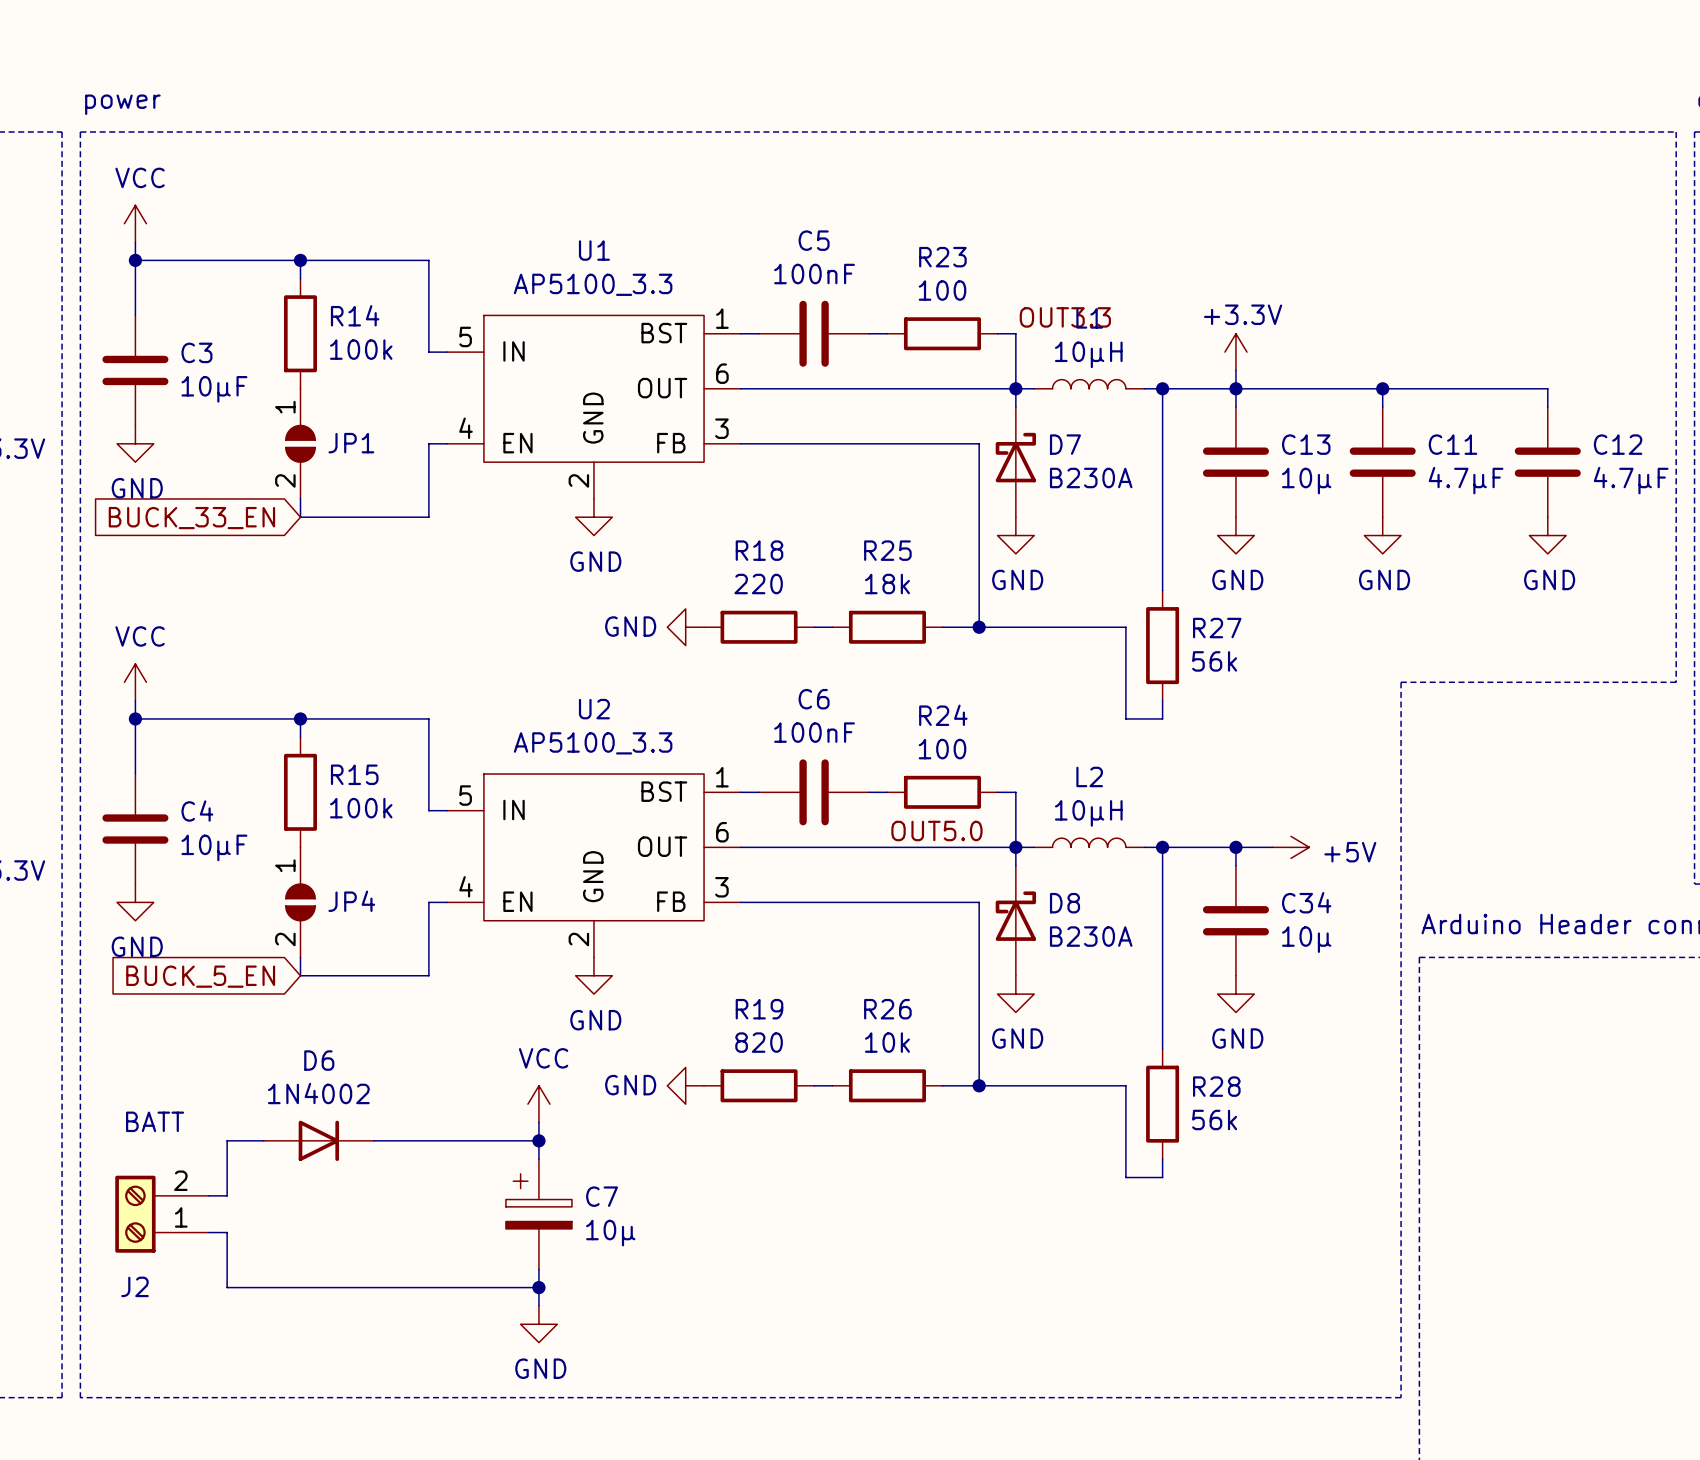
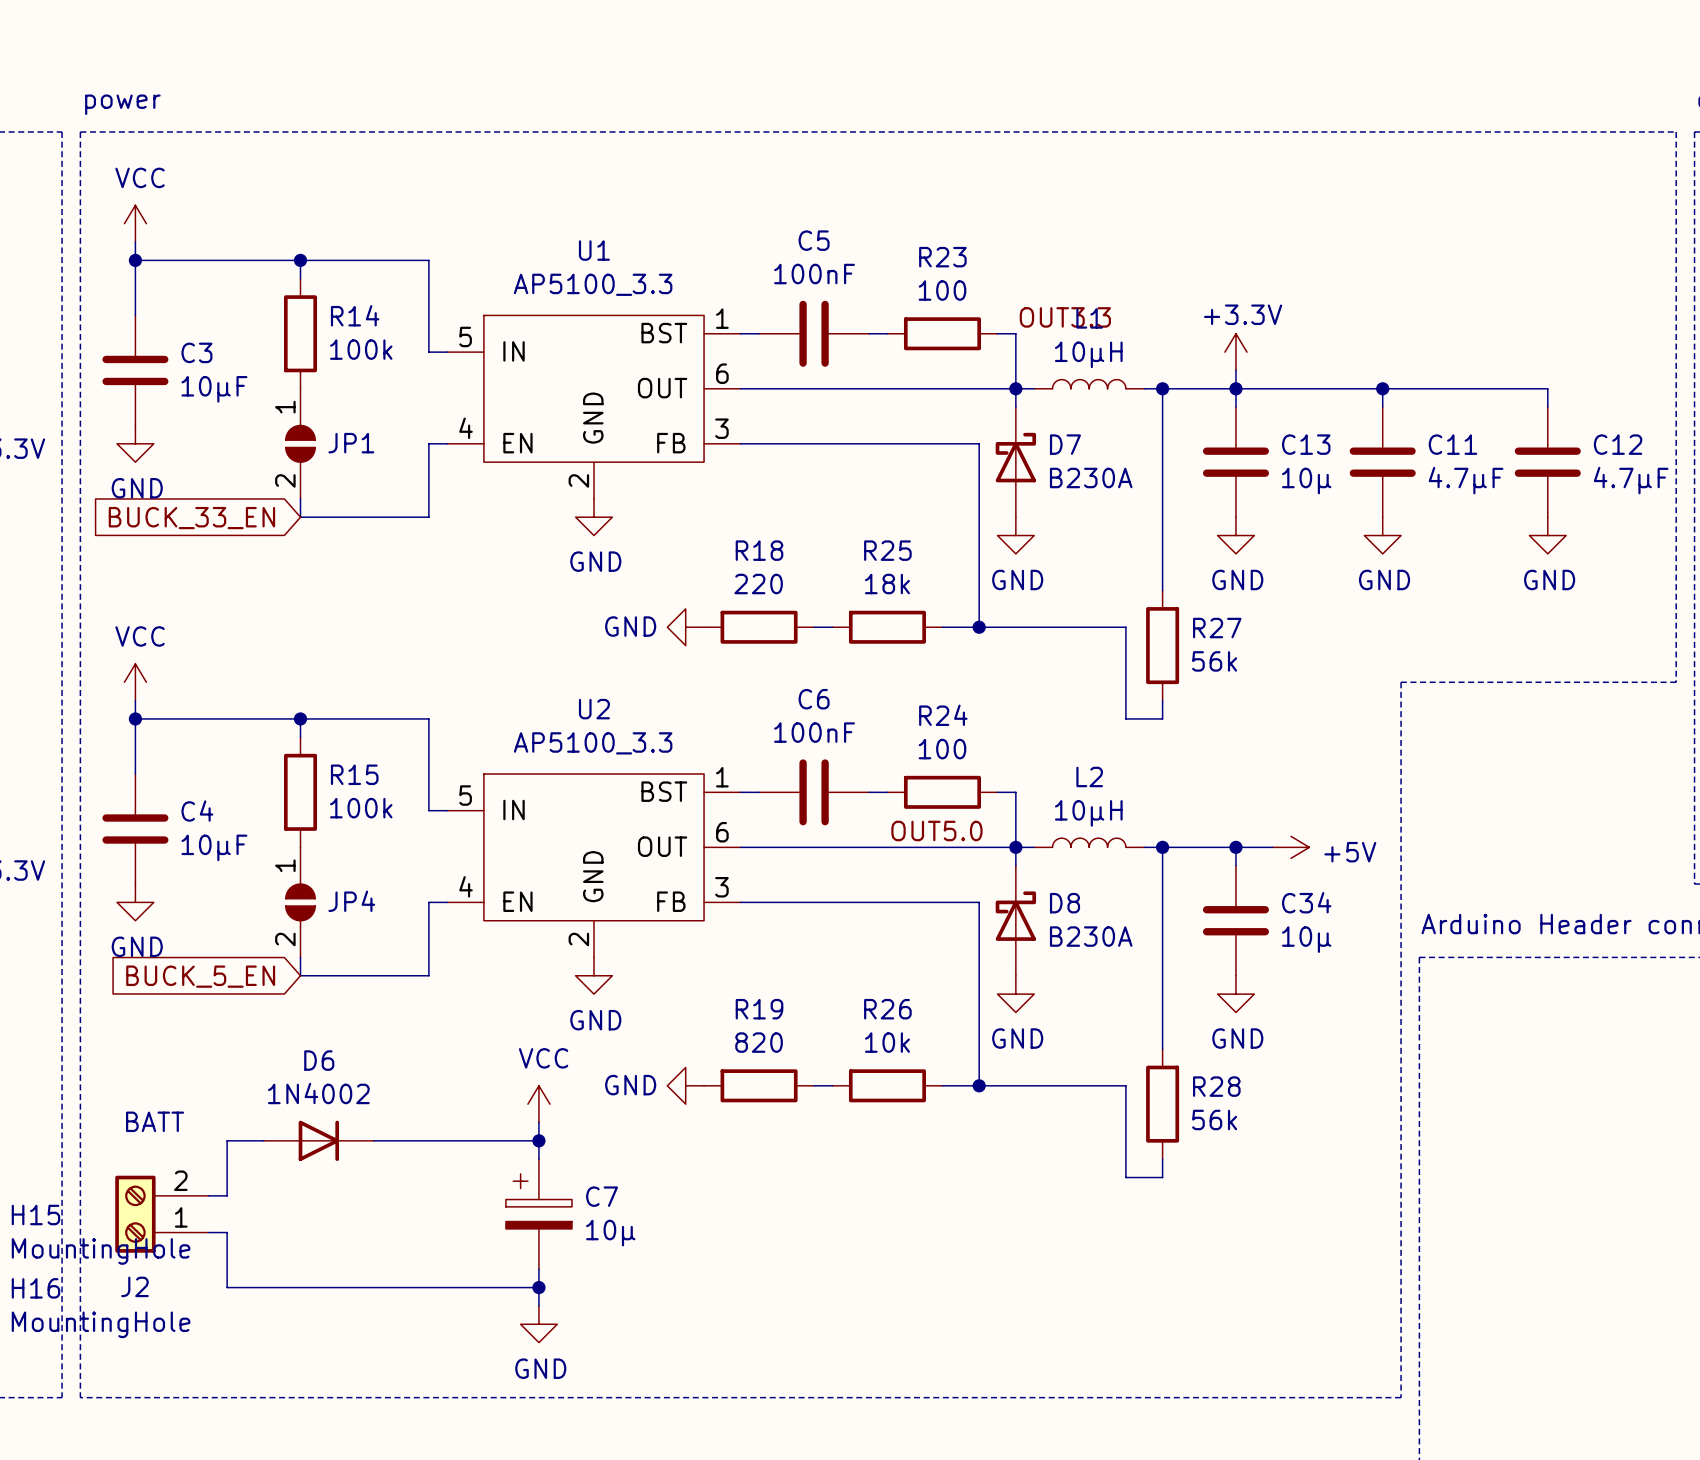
H15 name: none -> H15 (35, 1214)
H15 value: none -> MountingHole (101, 1251)
H16 name: none -> H16 (35, 1288)
H16 value: none -> MountingHole (101, 1324)

